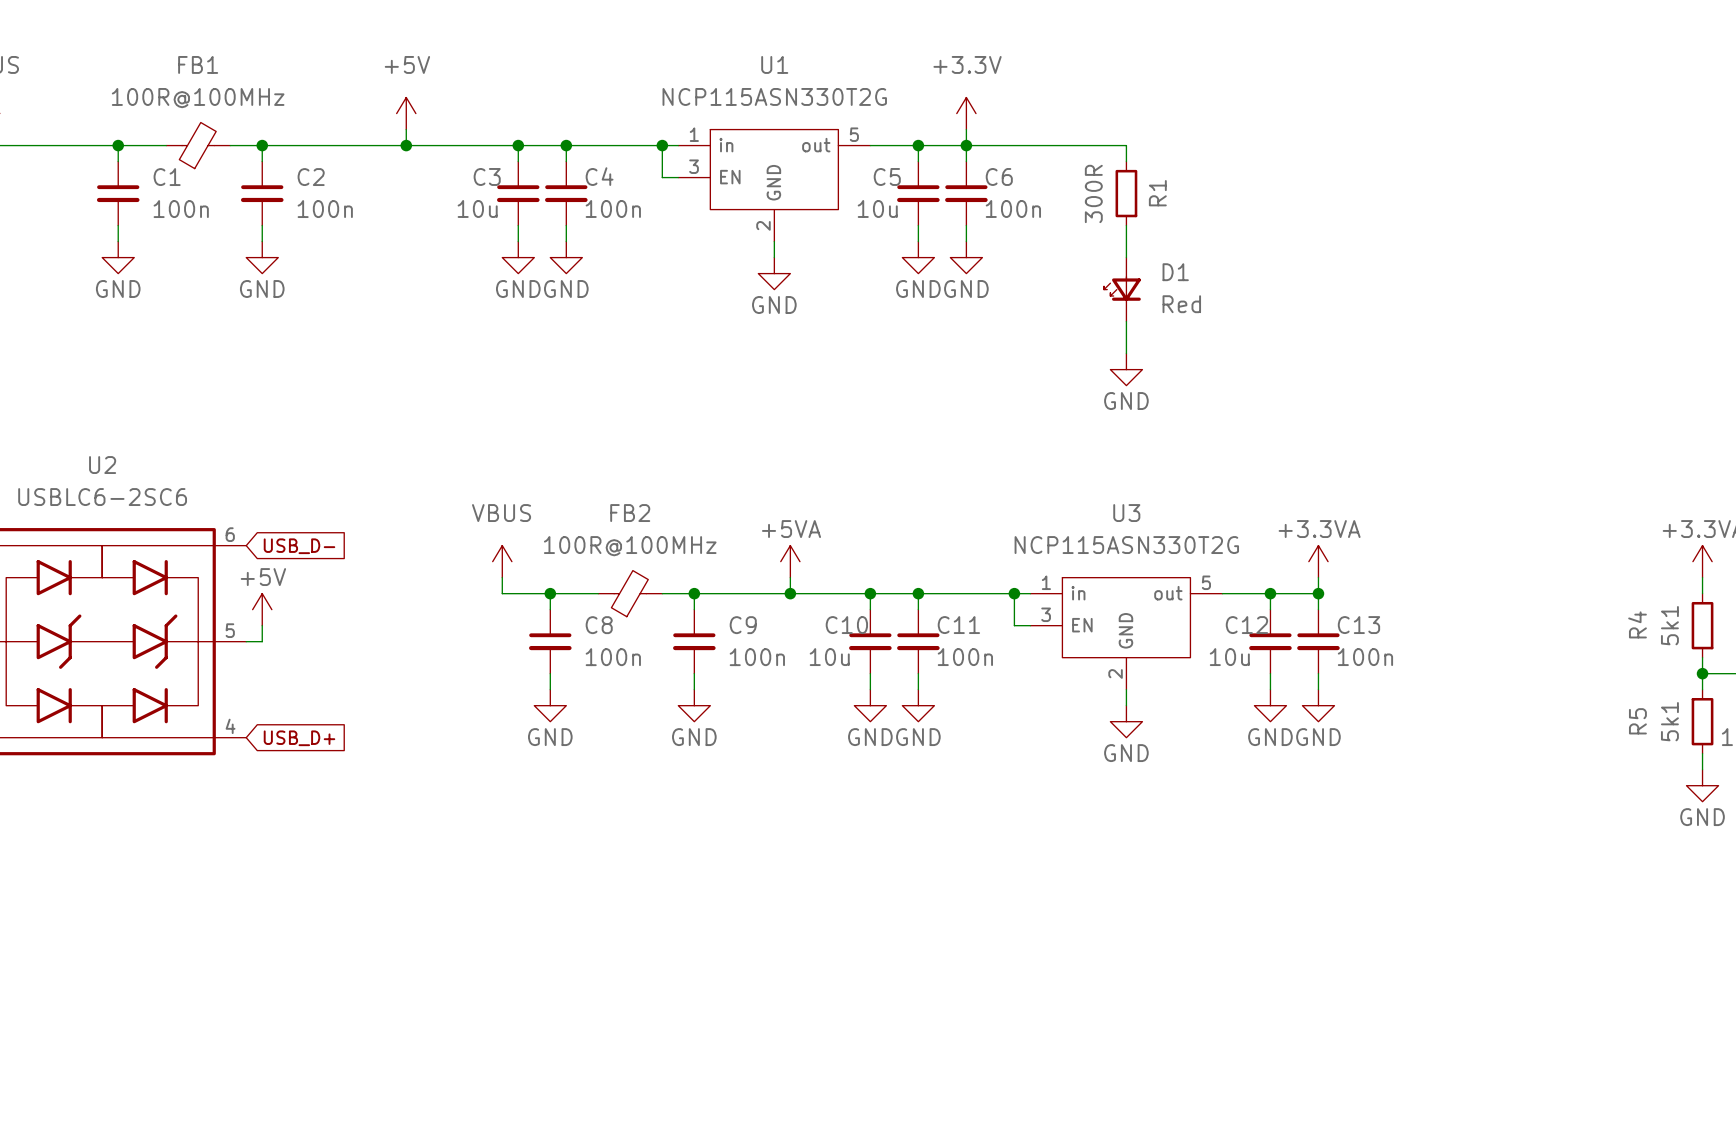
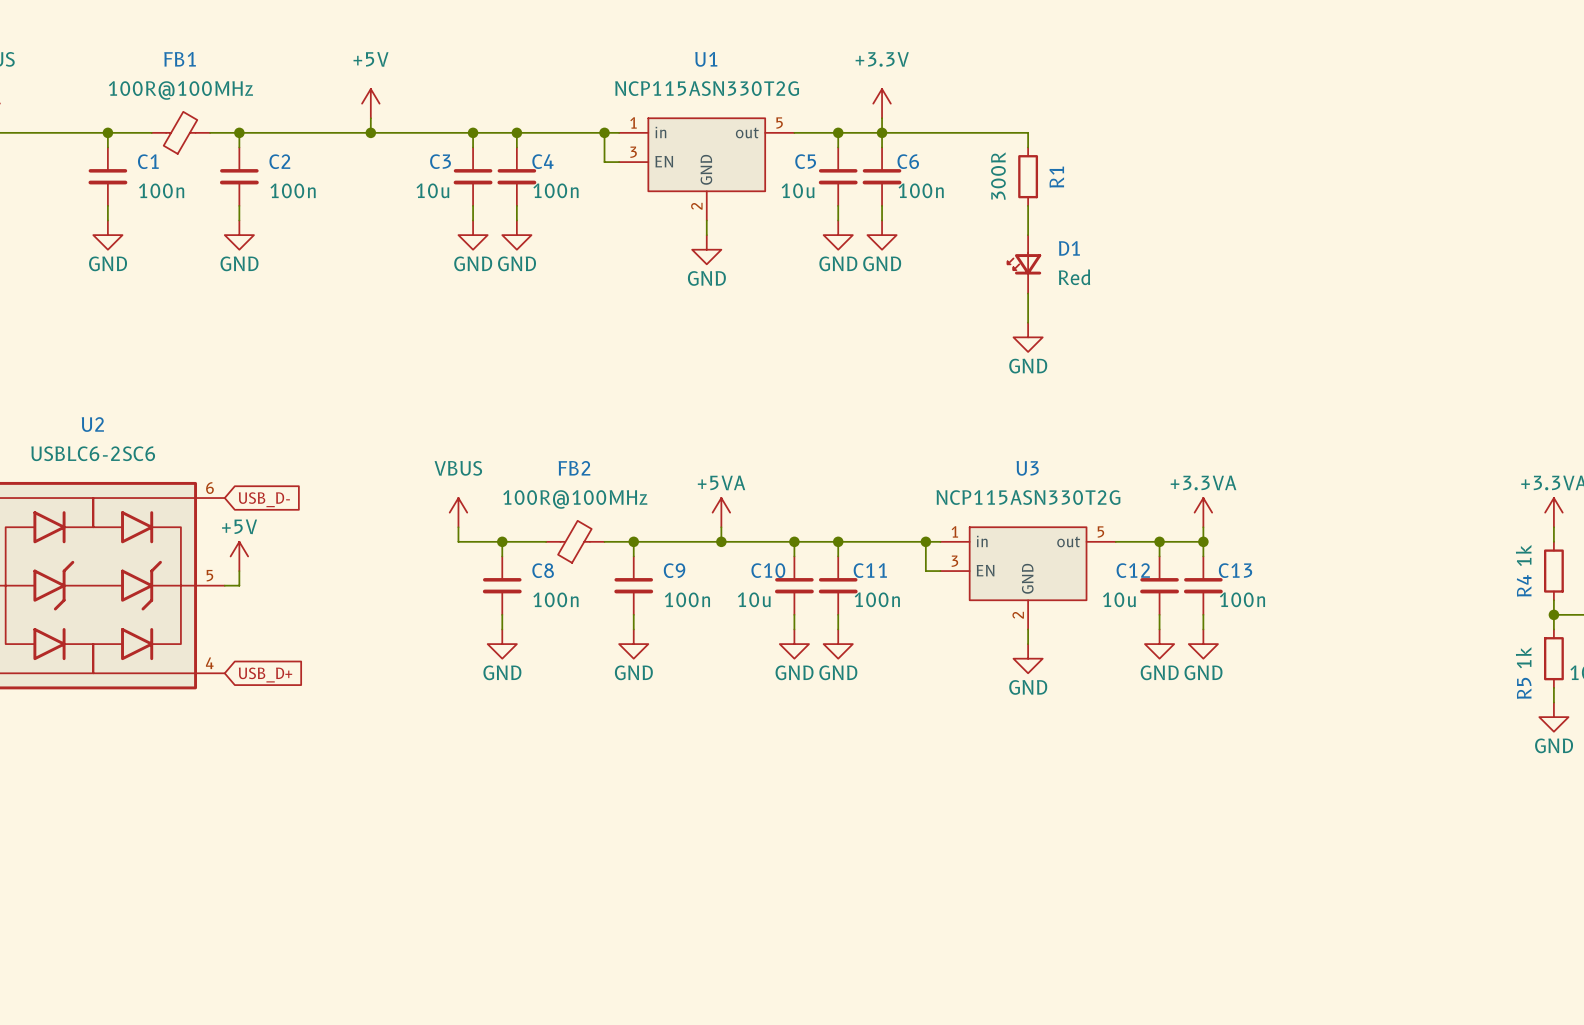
R4 name position: R4 (1637, 624) -> R4 (1524, 585)
R4 value: 5k1 (1669, 625) -> 1k (1523, 555)
R5 name position: R5 (1637, 721) -> R5 (1524, 688)
R5 value: 5k1 (1669, 721) -> 1k (1523, 657)

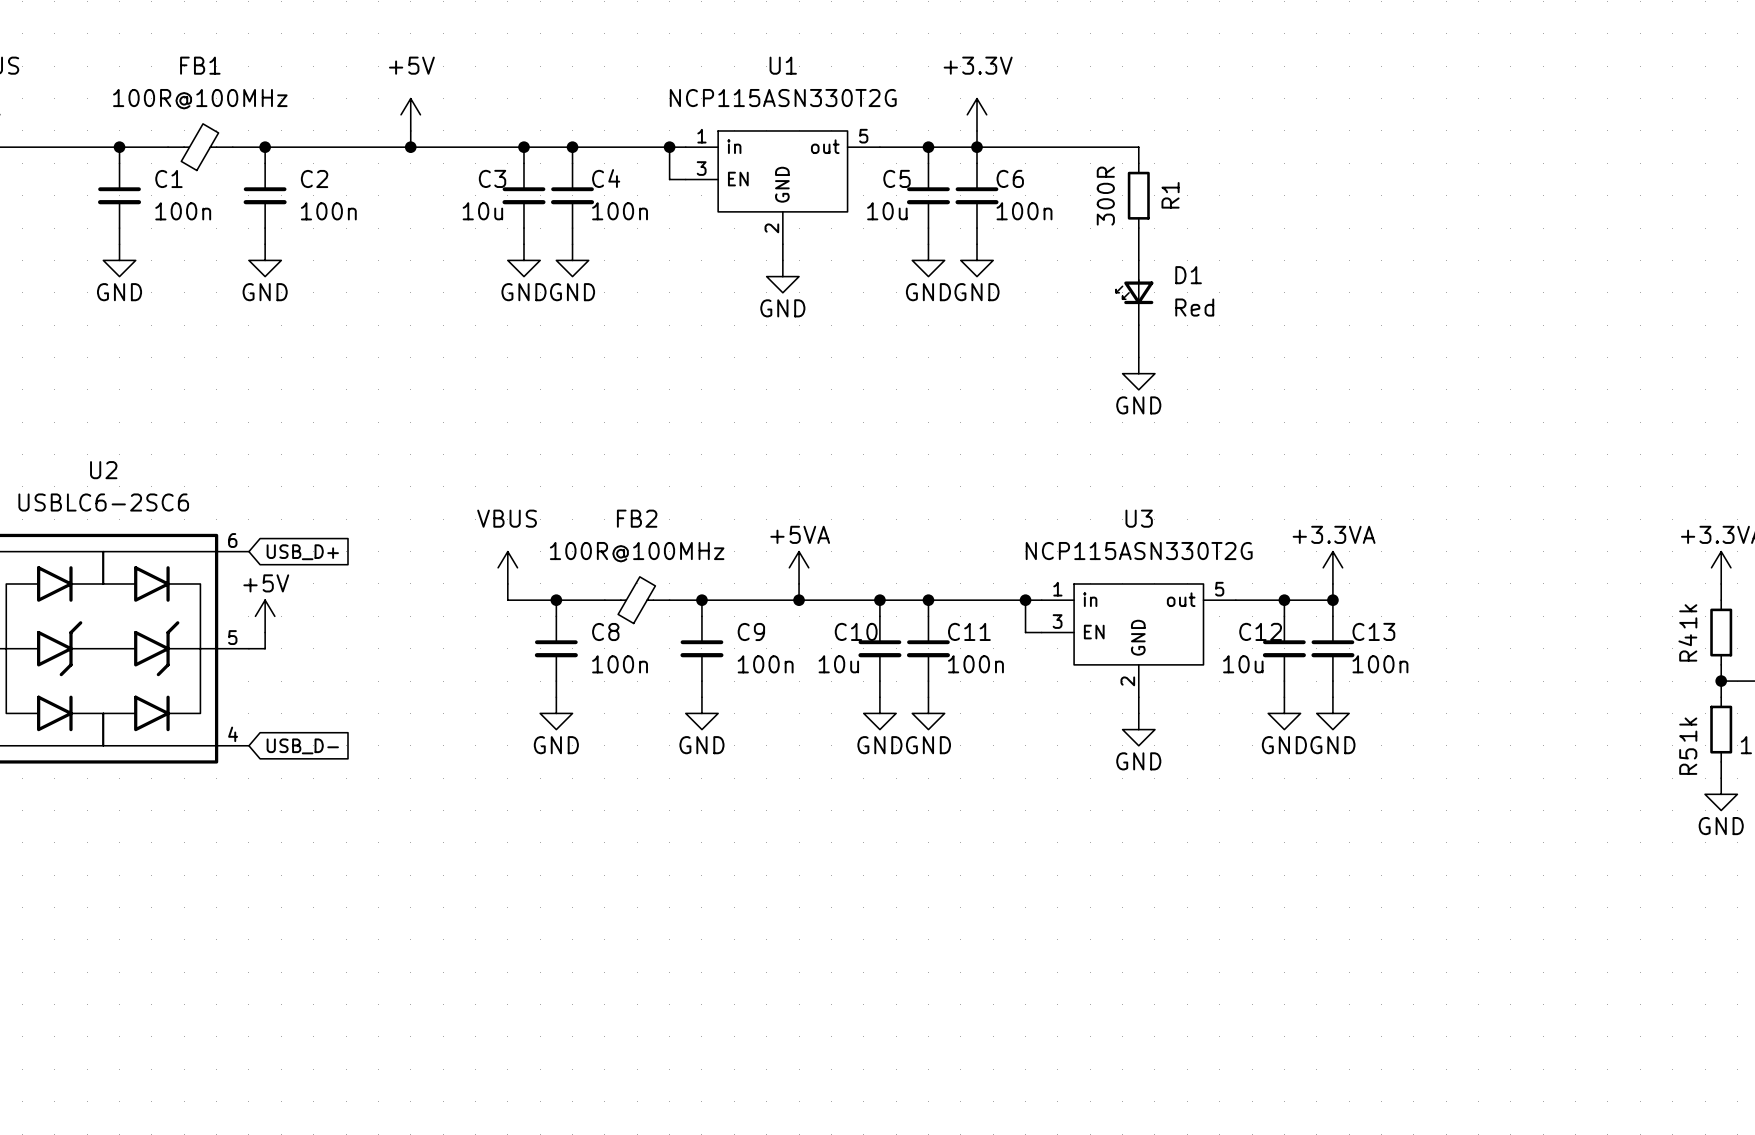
global label: USB_D- (264, 499) -> USB_D+ (302, 552)
global label: USB_D+ (265, 675) -> USB_D- (302, 746)

